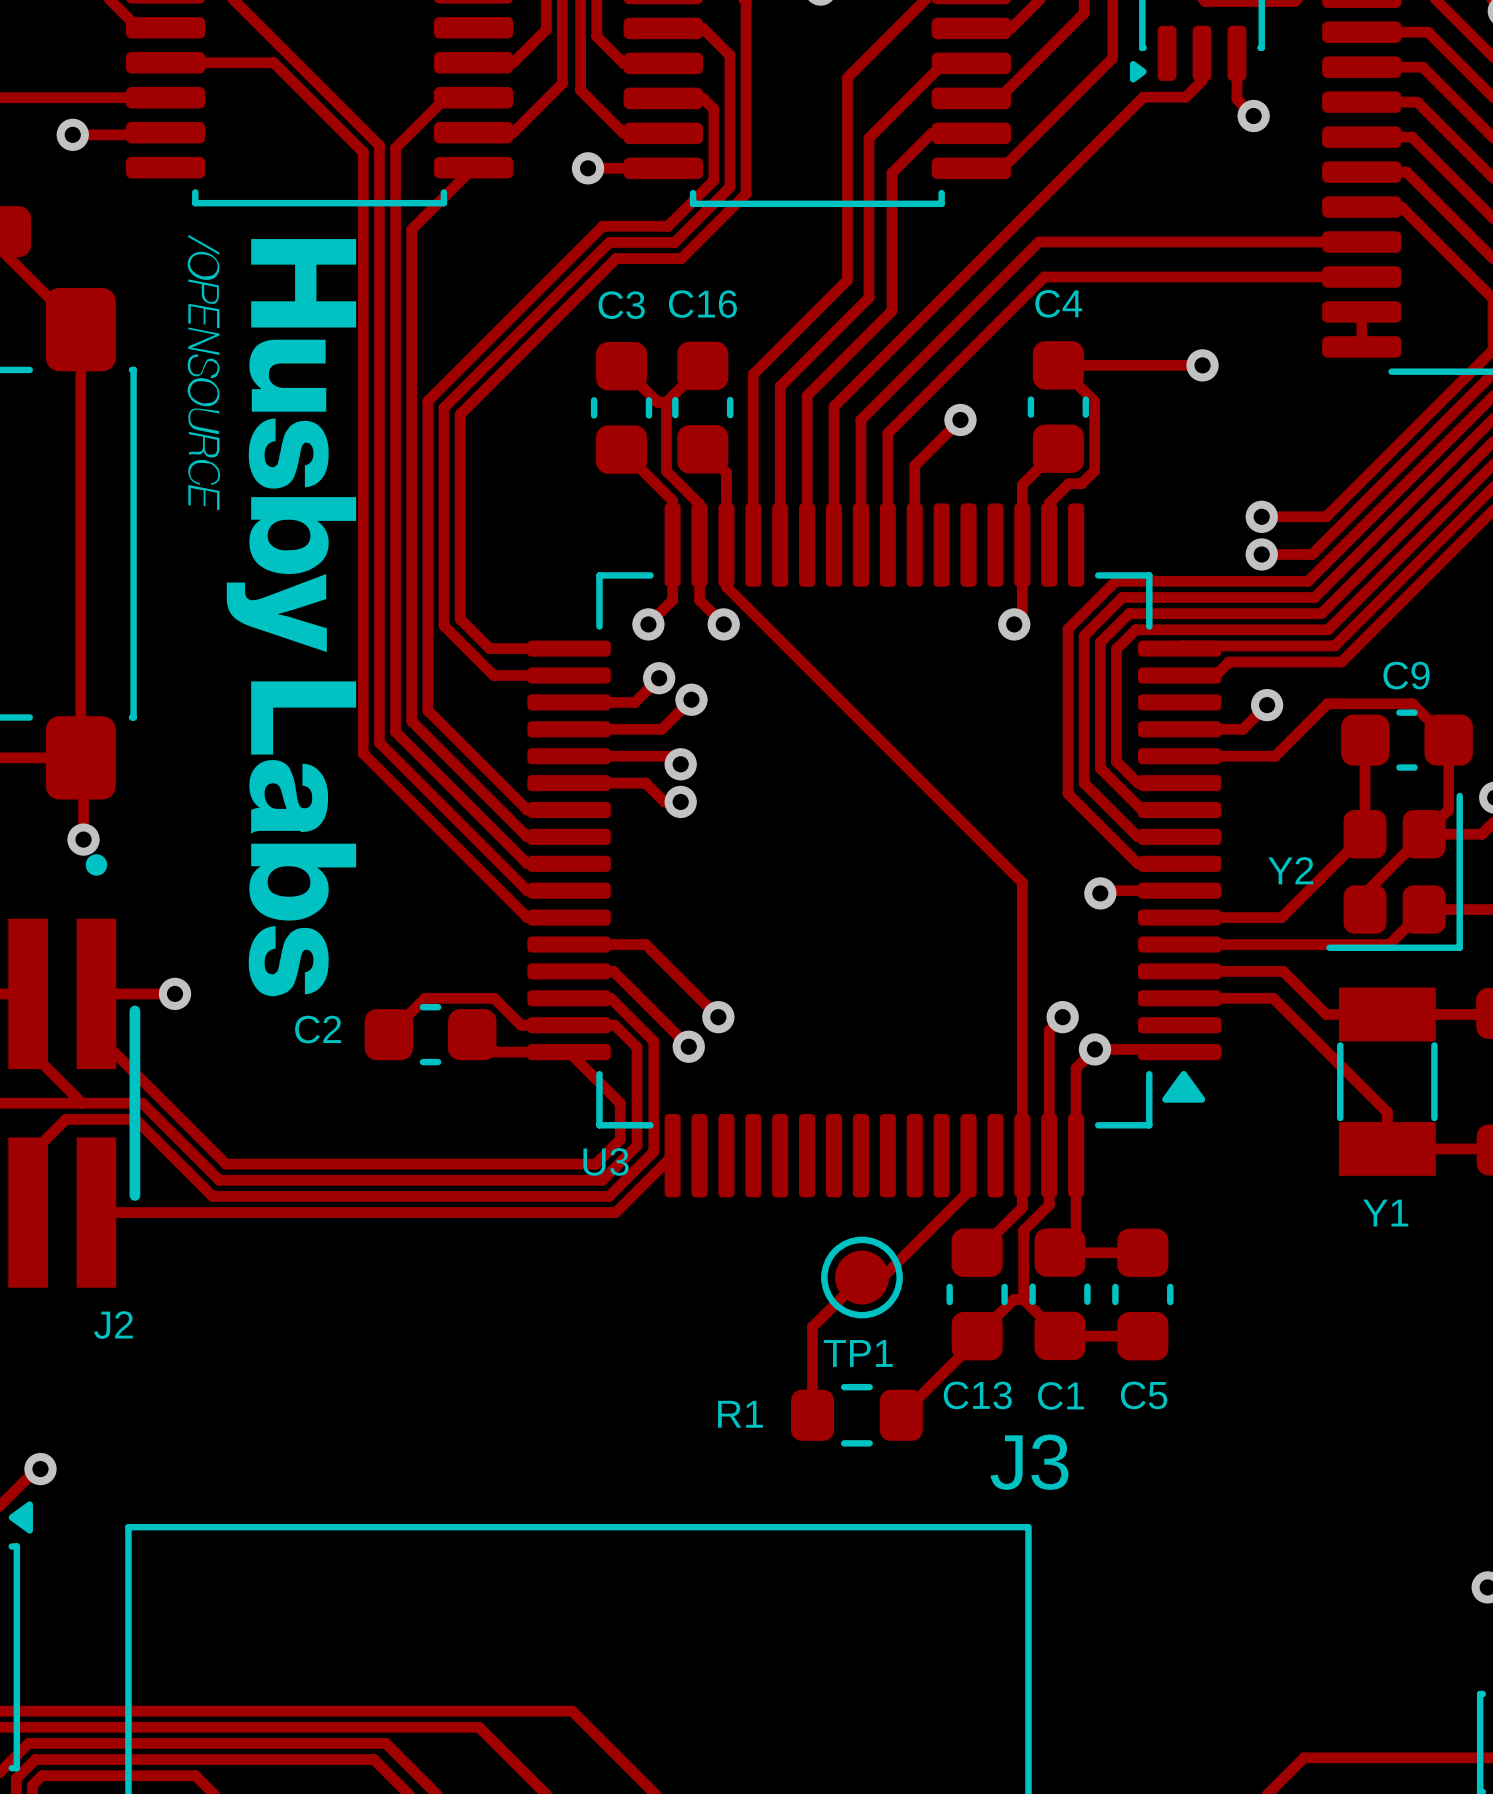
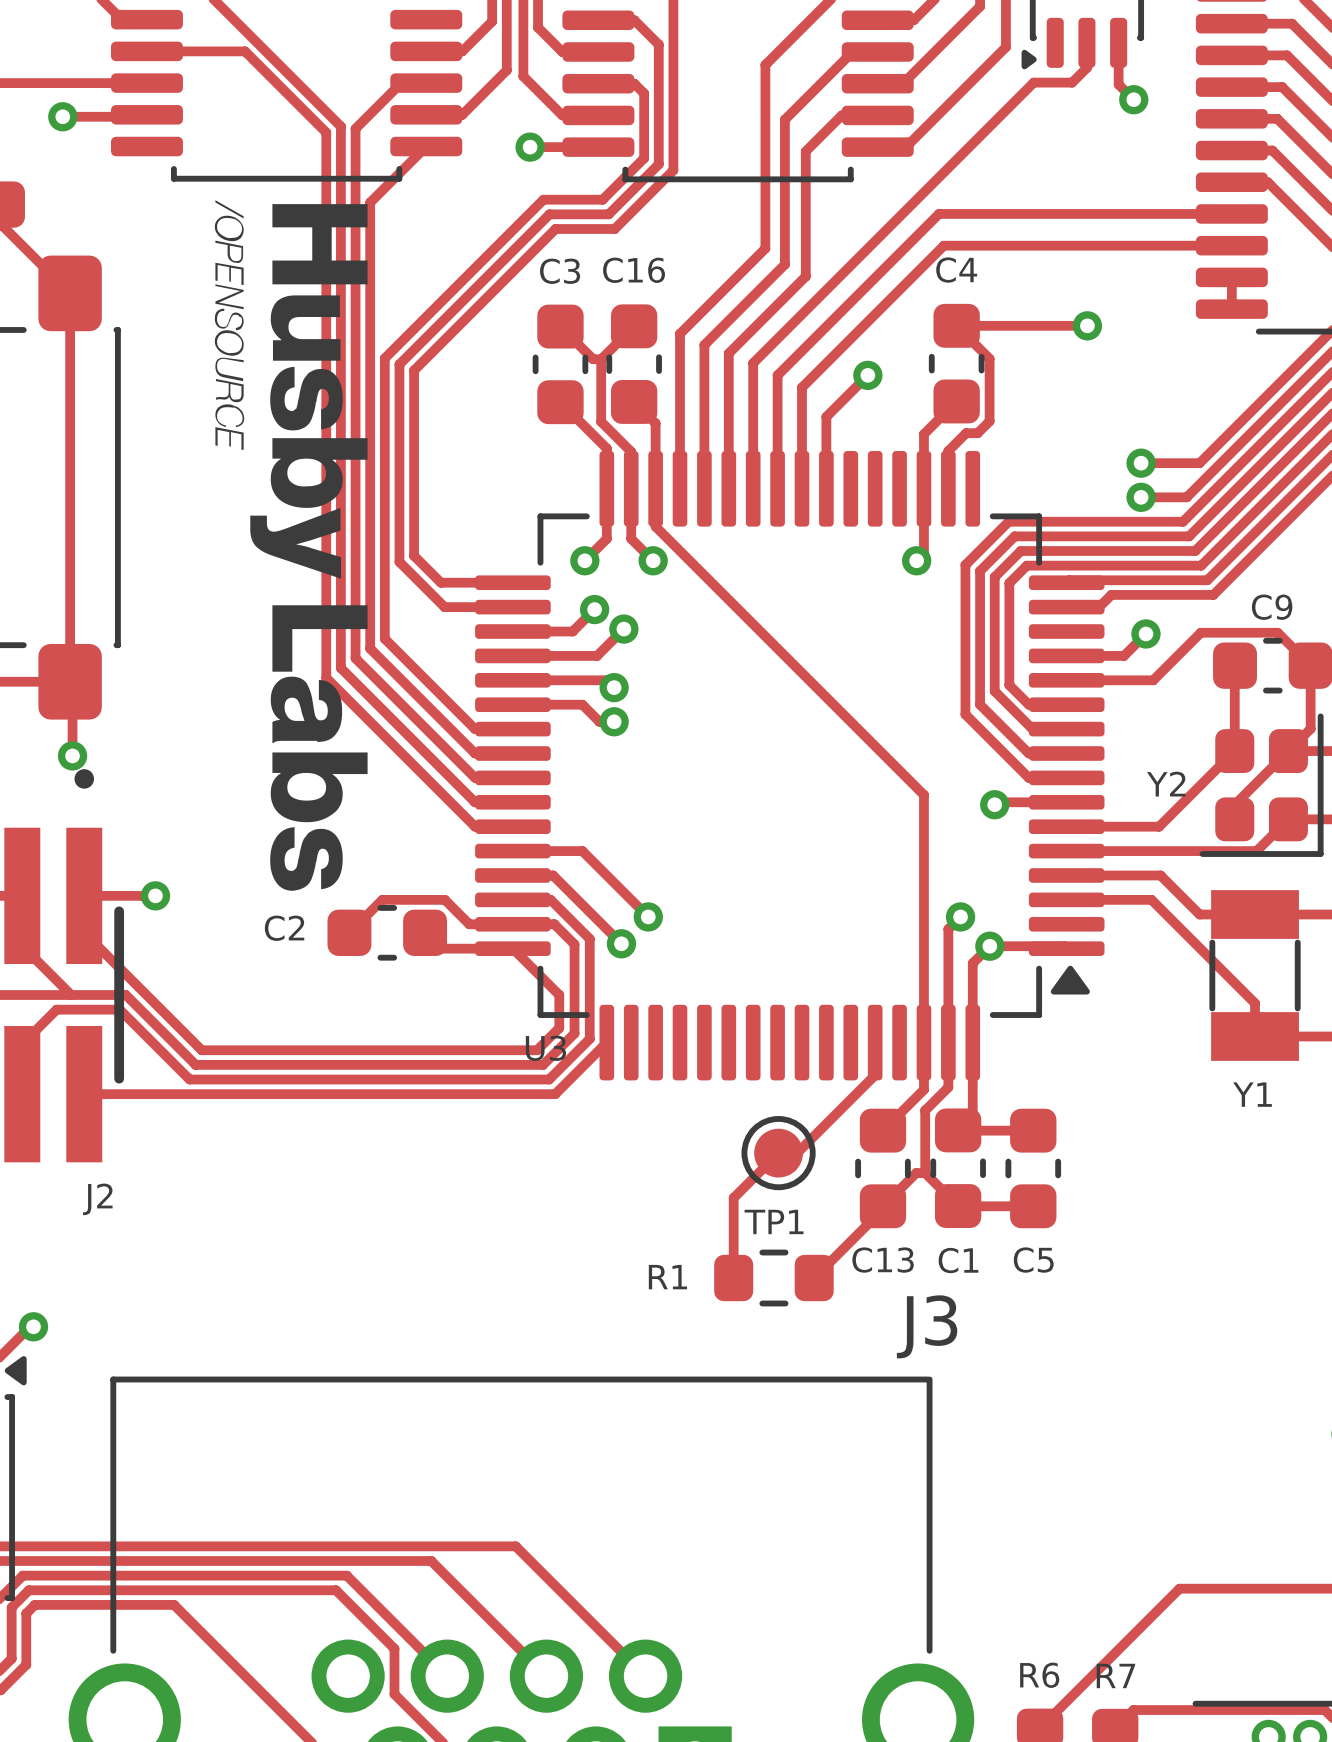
drawing position: (203, 244) -> (229, 209)
drawing position: (203, 265) -> (229, 228)
drawing position: (303, 283) -> (320, 244)
drawing position: (203, 291) -> (229, 251)
drawing position: (203, 315) -> (229, 273)
drawing position: (203, 341) -> (229, 296)
drawing position: (203, 366) -> (229, 319)
drawing position: (287, 375) -> (305, 328)
drawing position: (203, 392) -> (229, 342)
drawing position: (203, 421) -> (229, 369)
drawing position: (204, 444) -> (229, 390)
drawing position: (288, 453) -> (306, 398)
drawing position: (204, 472) -> (229, 415)
drawing position: (203, 497) -> (229, 438)
drawing position: (302, 535) -> (319, 473)
drawing position: (276, 613) -> (295, 543)
drawing position: (303, 717) -> (320, 638)
drawing position: (288, 796) -> (306, 709)
drawing position: (302, 882) -> (319, 787)
drawing position: (288, 961) -> (306, 858)

